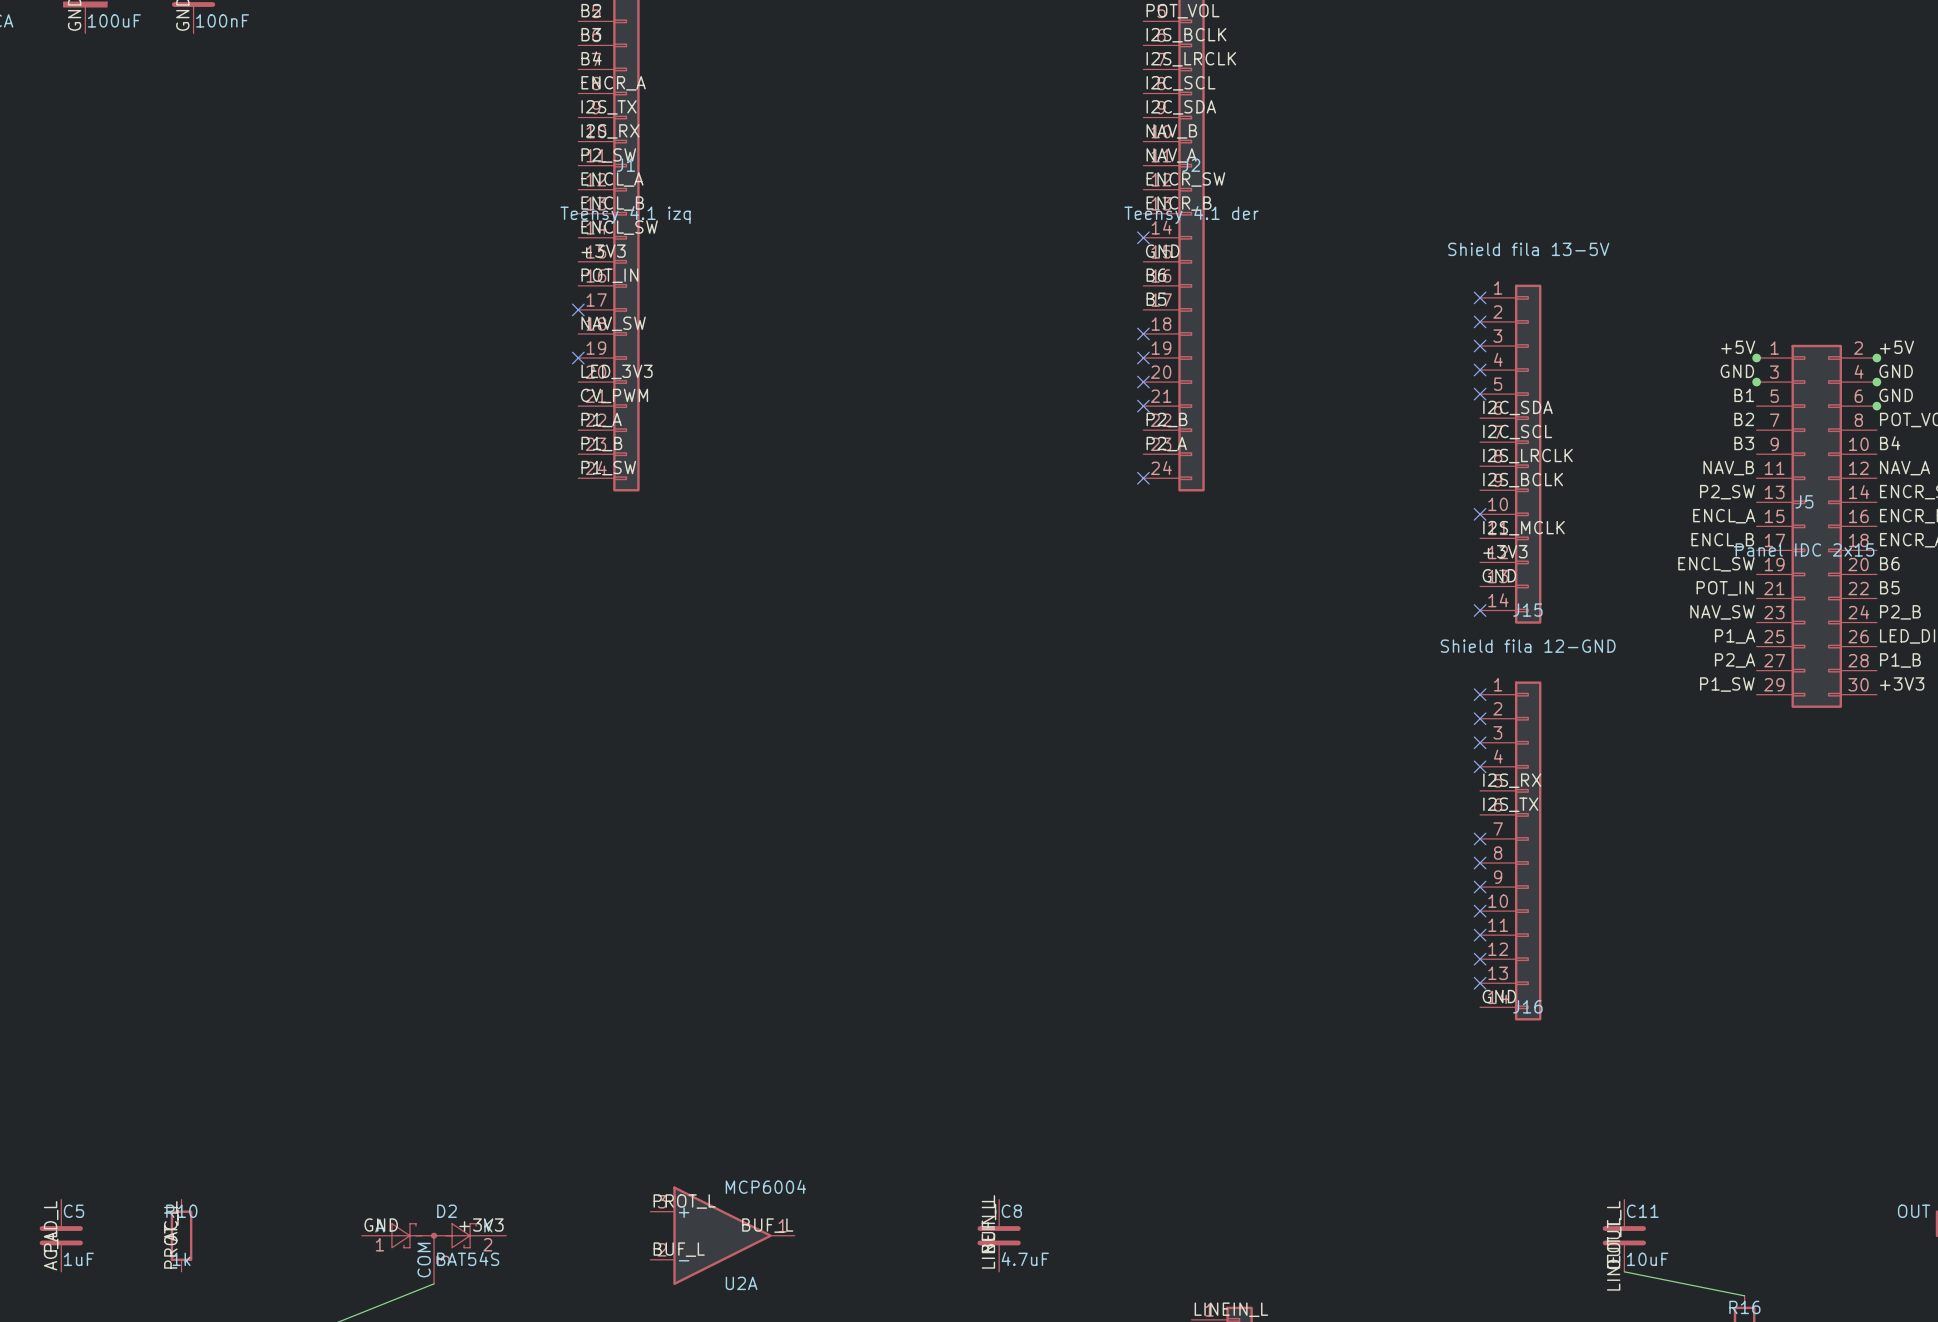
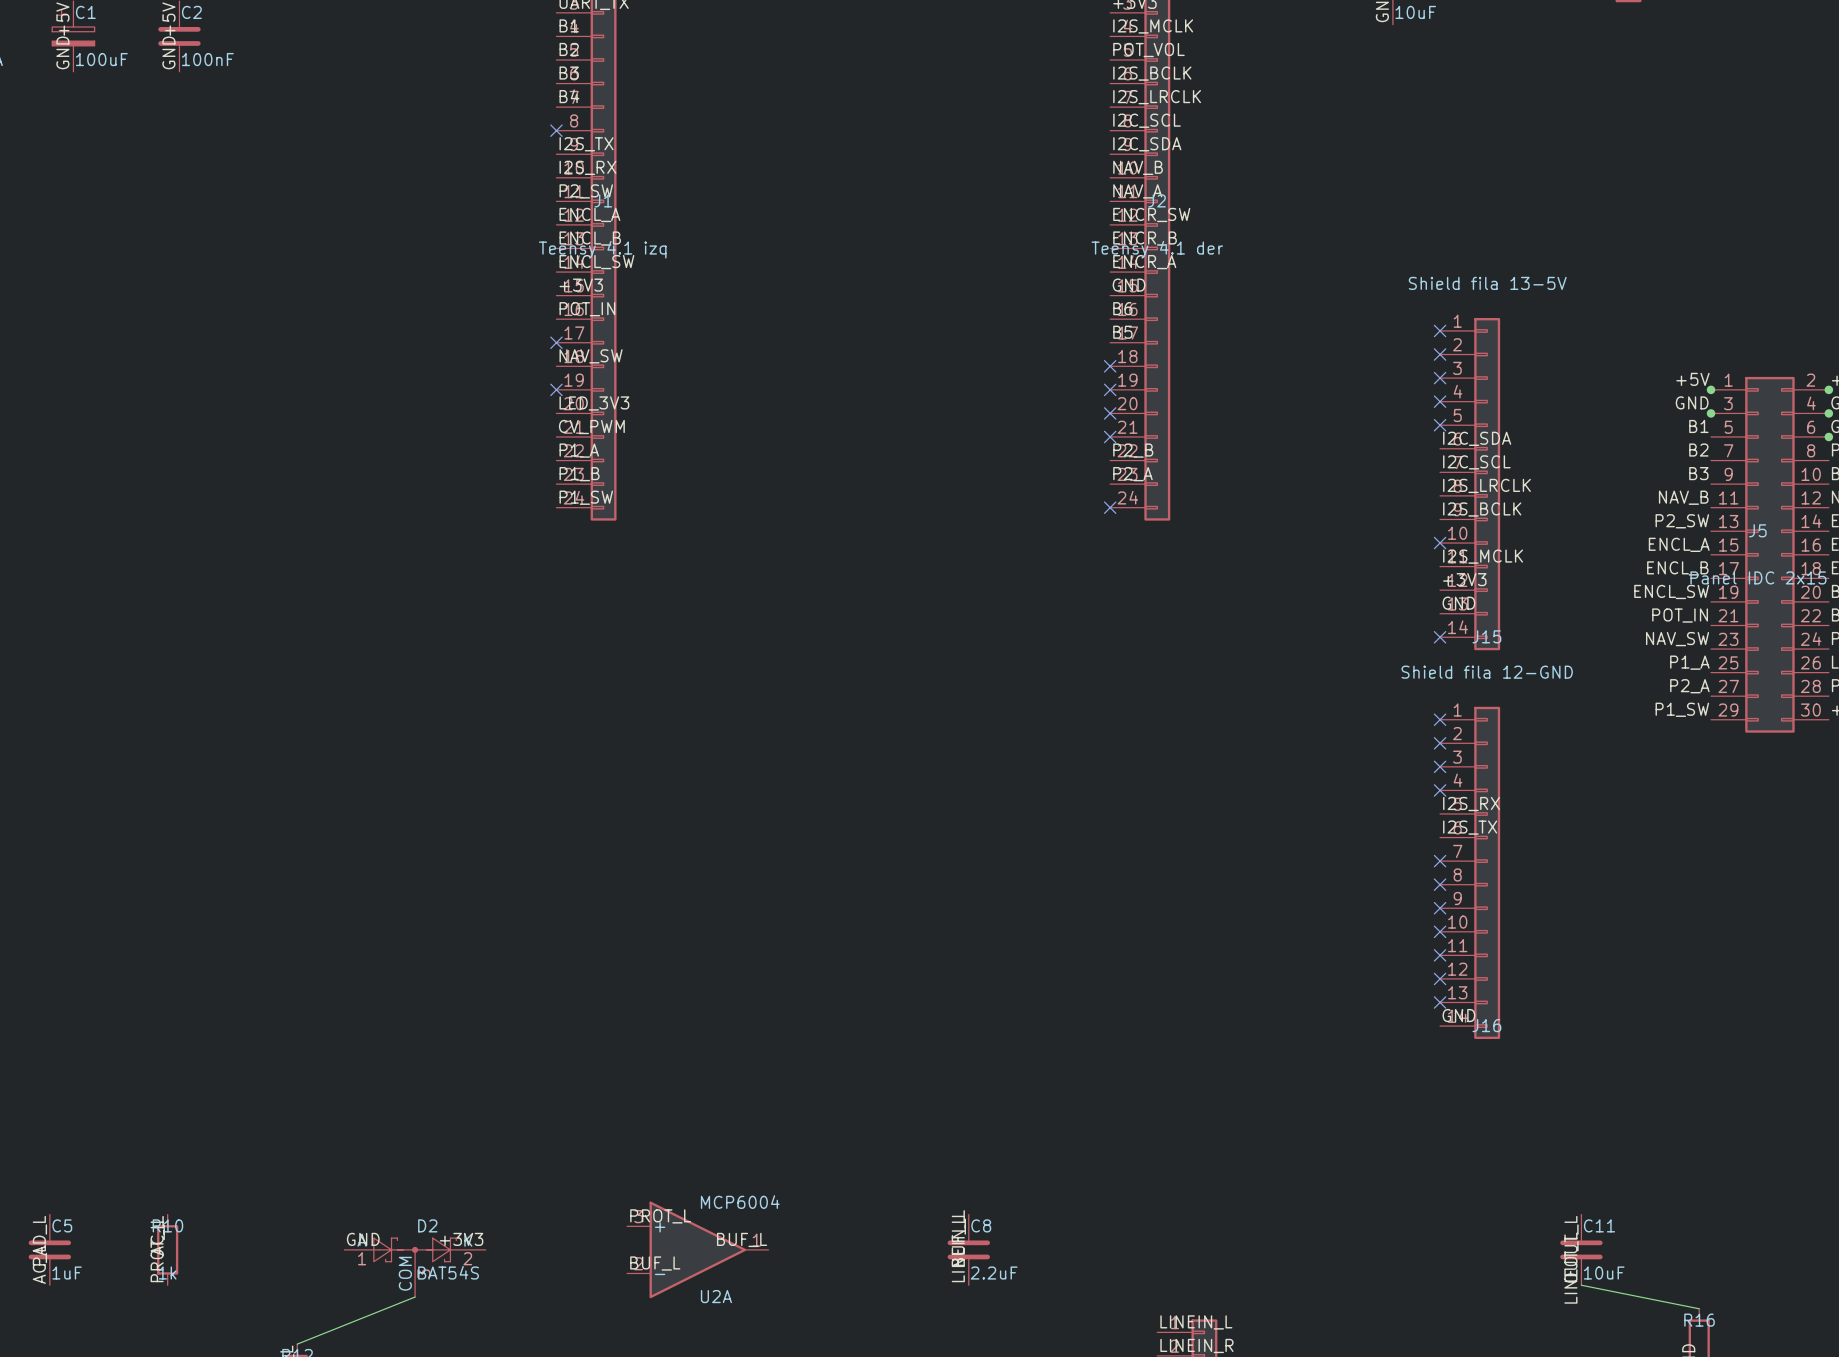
label: ENCR_A (613, 83) -> none
no-connect mark: none -> (556, 130)
label: none -> ENCR_A (1144, 262)
no-connect mark: (1143, 237) -> none
C8 value: 4.7uF (1025, 1259) -> 2.2uF (994, 1273)

